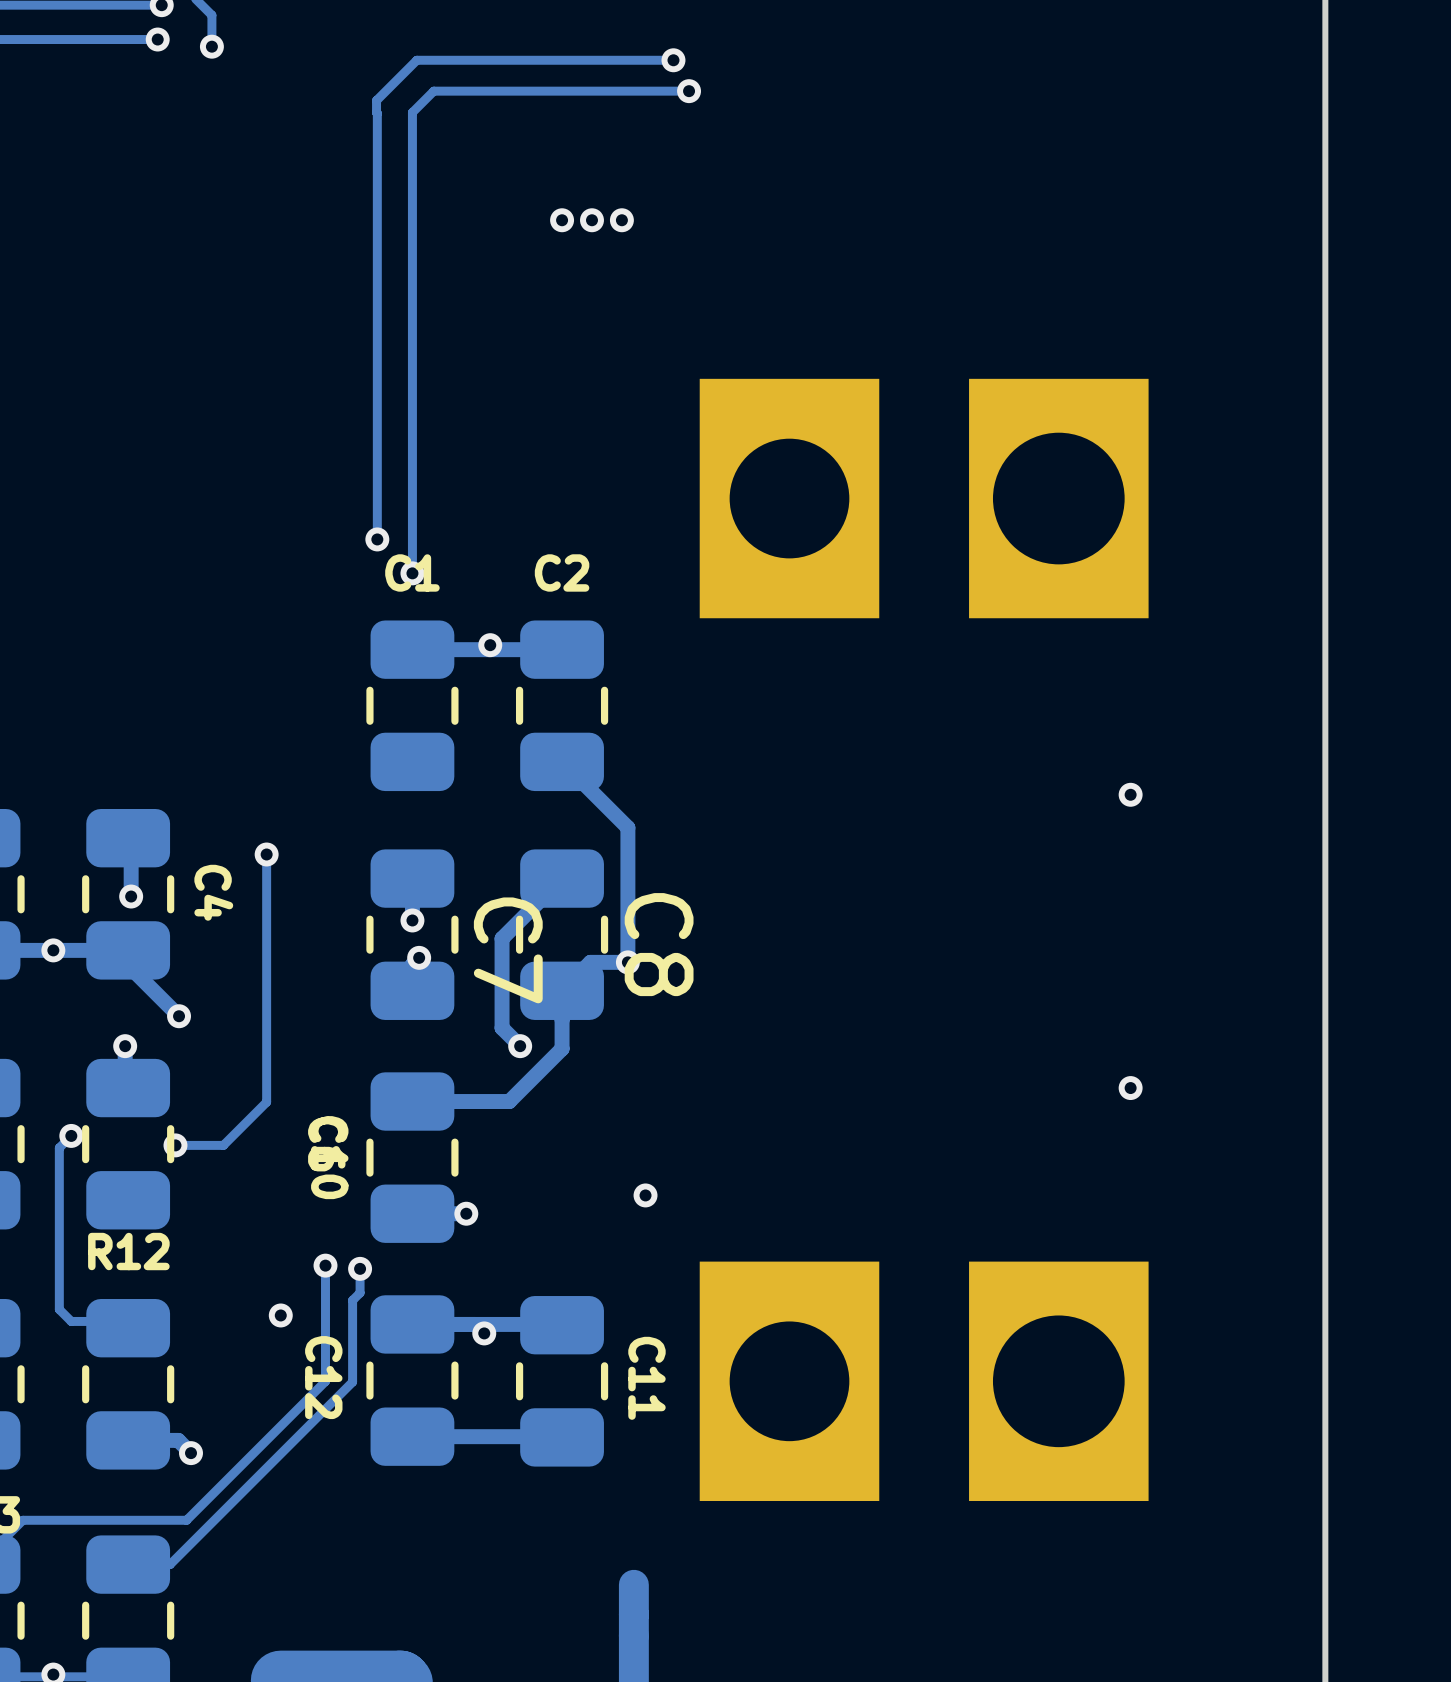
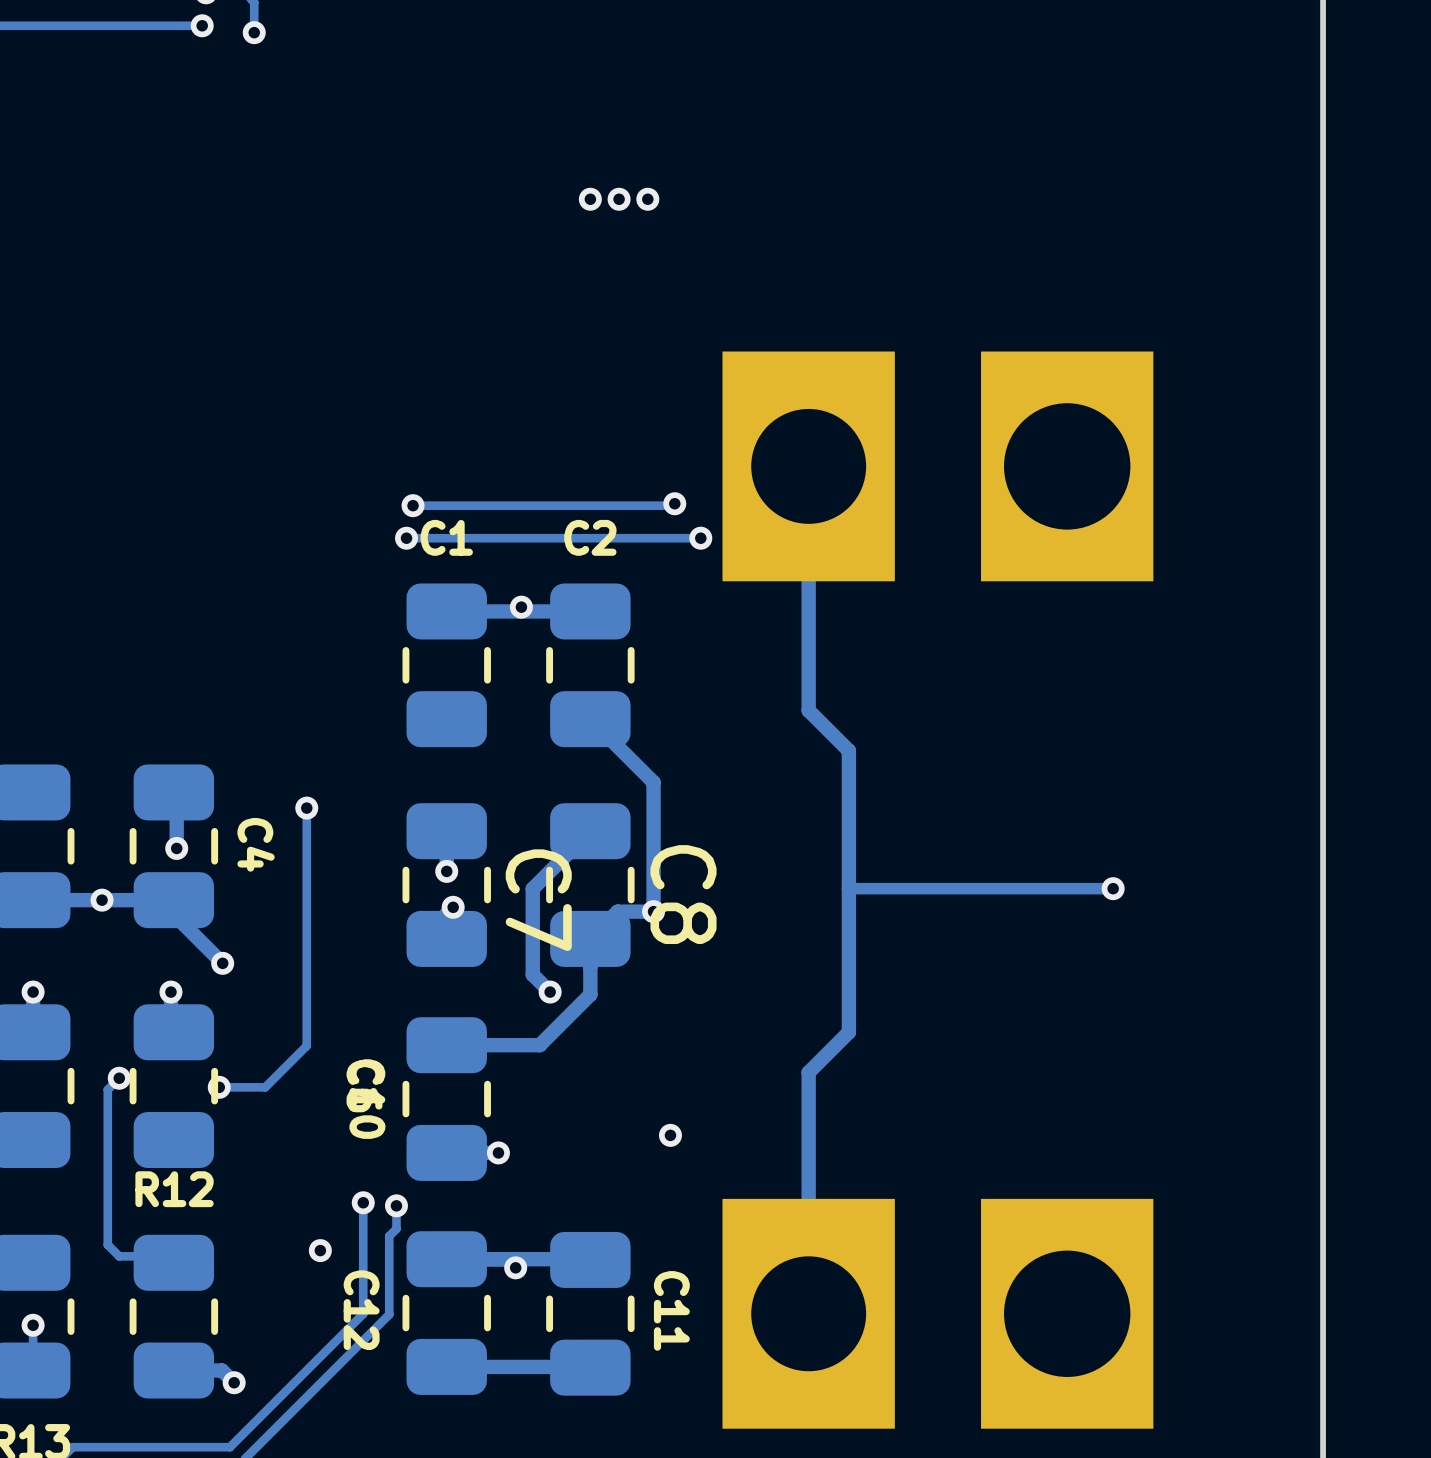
track: (673, 60) (416, 60) (376, 100) (376, 112) -> none
via: (673, 60) -> none
track: (689, 91) (433, 91) (412, 112) (412, 573) -> none
via: (689, 91) -> none
track: (377, 113) (377, 539) -> (674, 503) (672, 505) (413, 505)
track: none -> (808, 466) (808, 710) (848, 750) (848, 1032) (808, 1072) (808, 1313)
via: none -> (674, 503)
via position: (412, 573) -> (406, 538)
track: none -> (700, 538) (406, 538)
via: none -> (700, 538)
via: (1130, 794) -> none
track: none -> (1113, 888) (848, 888)
via: none -> (1113, 888)
via: (1130, 1088) -> none

